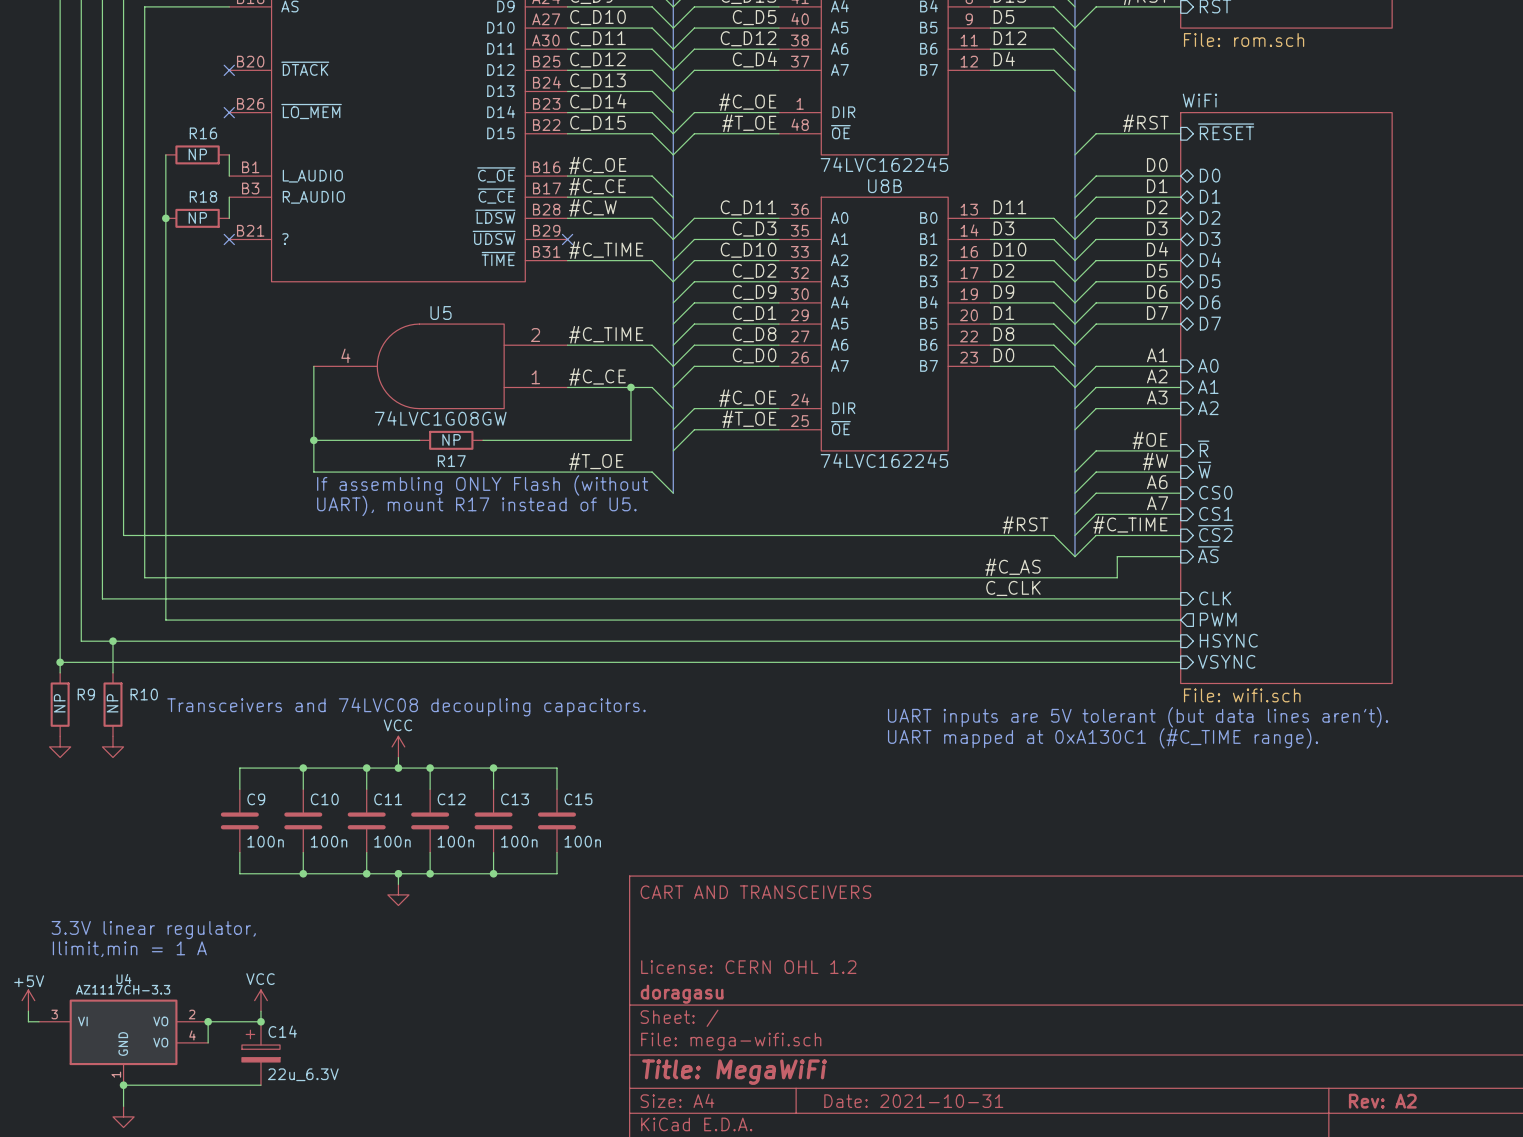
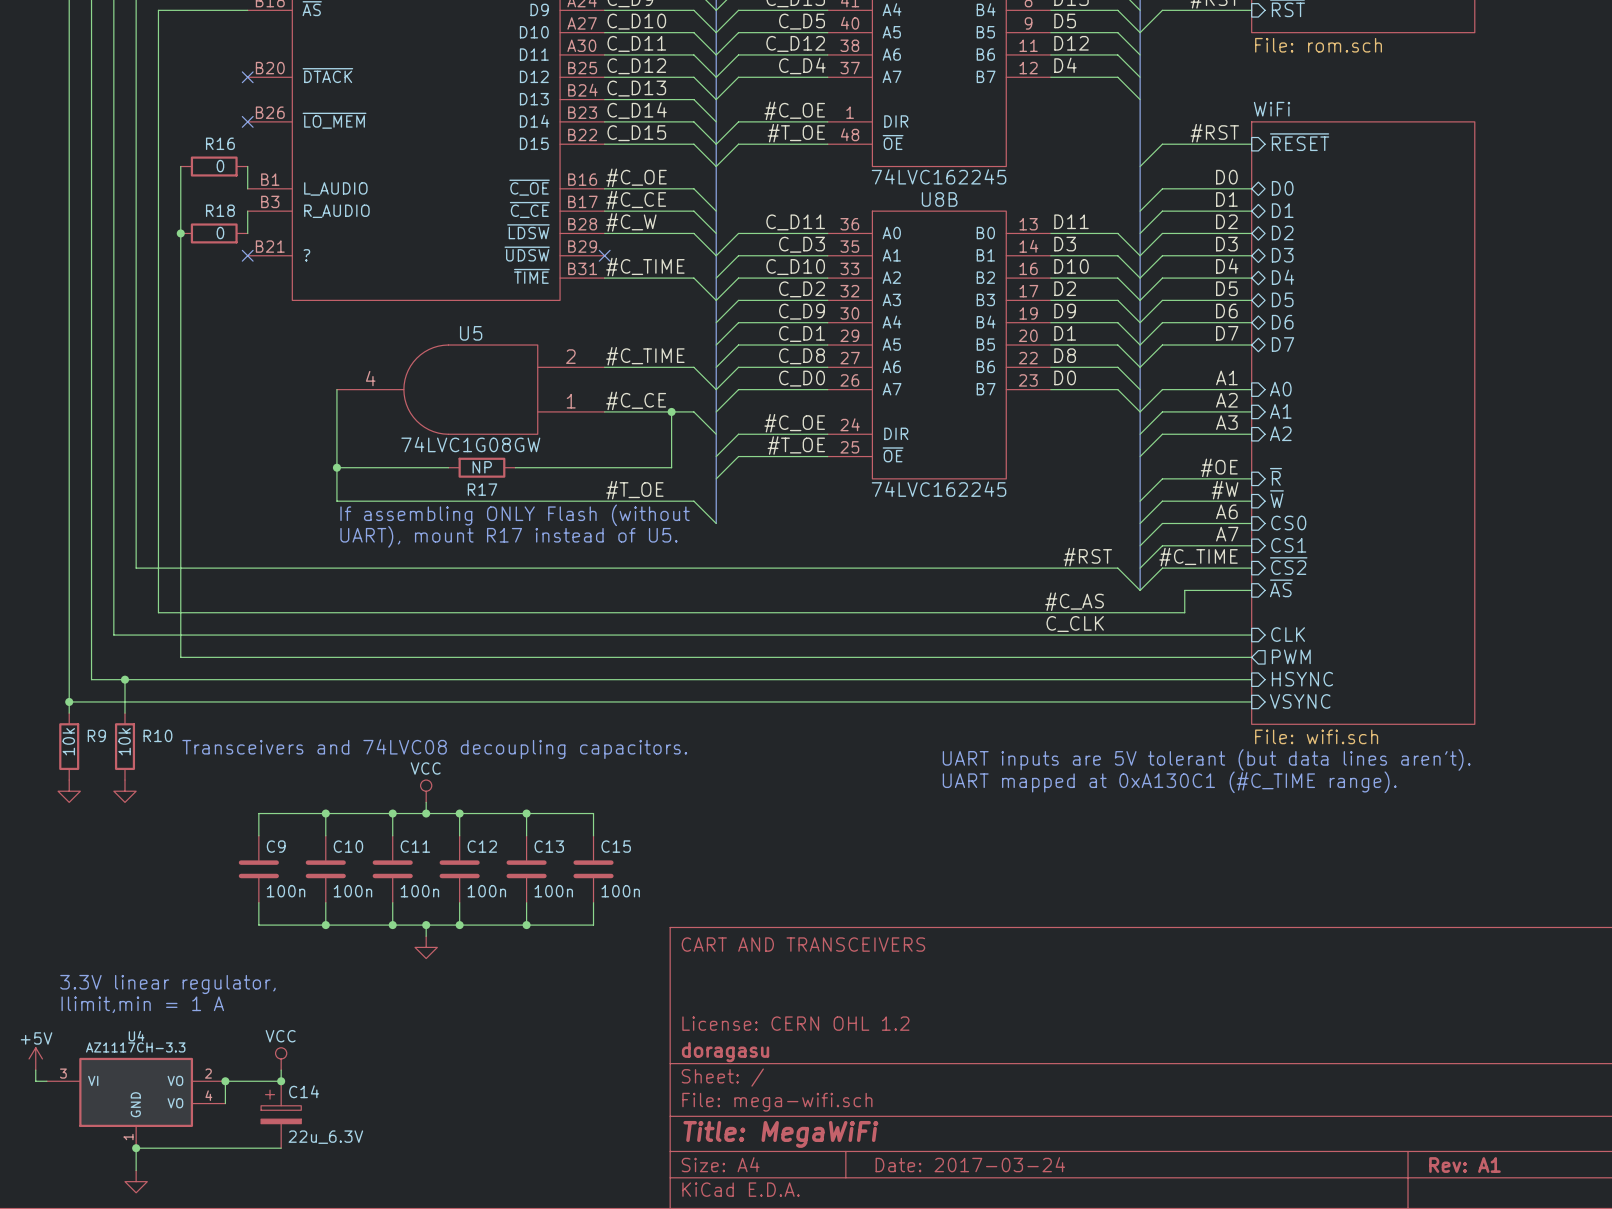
R16 value: NP (197, 154) -> 0 (220, 166)
R18 value: NP (197, 217) -> 0 (220, 233)
R9 value: NP (59, 703) -> 10k (68, 741)
R10 value: NP (112, 703) -> 10k (124, 741)
power symbol shape: [392, 736, 405, 758] -> [420, 780, 432, 803]
power symbol shape: [254, 990, 268, 1012] -> [275, 1047, 287, 1071]
title block: Date: 2021-10-31 (913, 1101) -> Date: 2017-03-24 (970, 1164)
title block: Rev: A2 (1382, 1101) -> Rev: A1 (1464, 1165)

